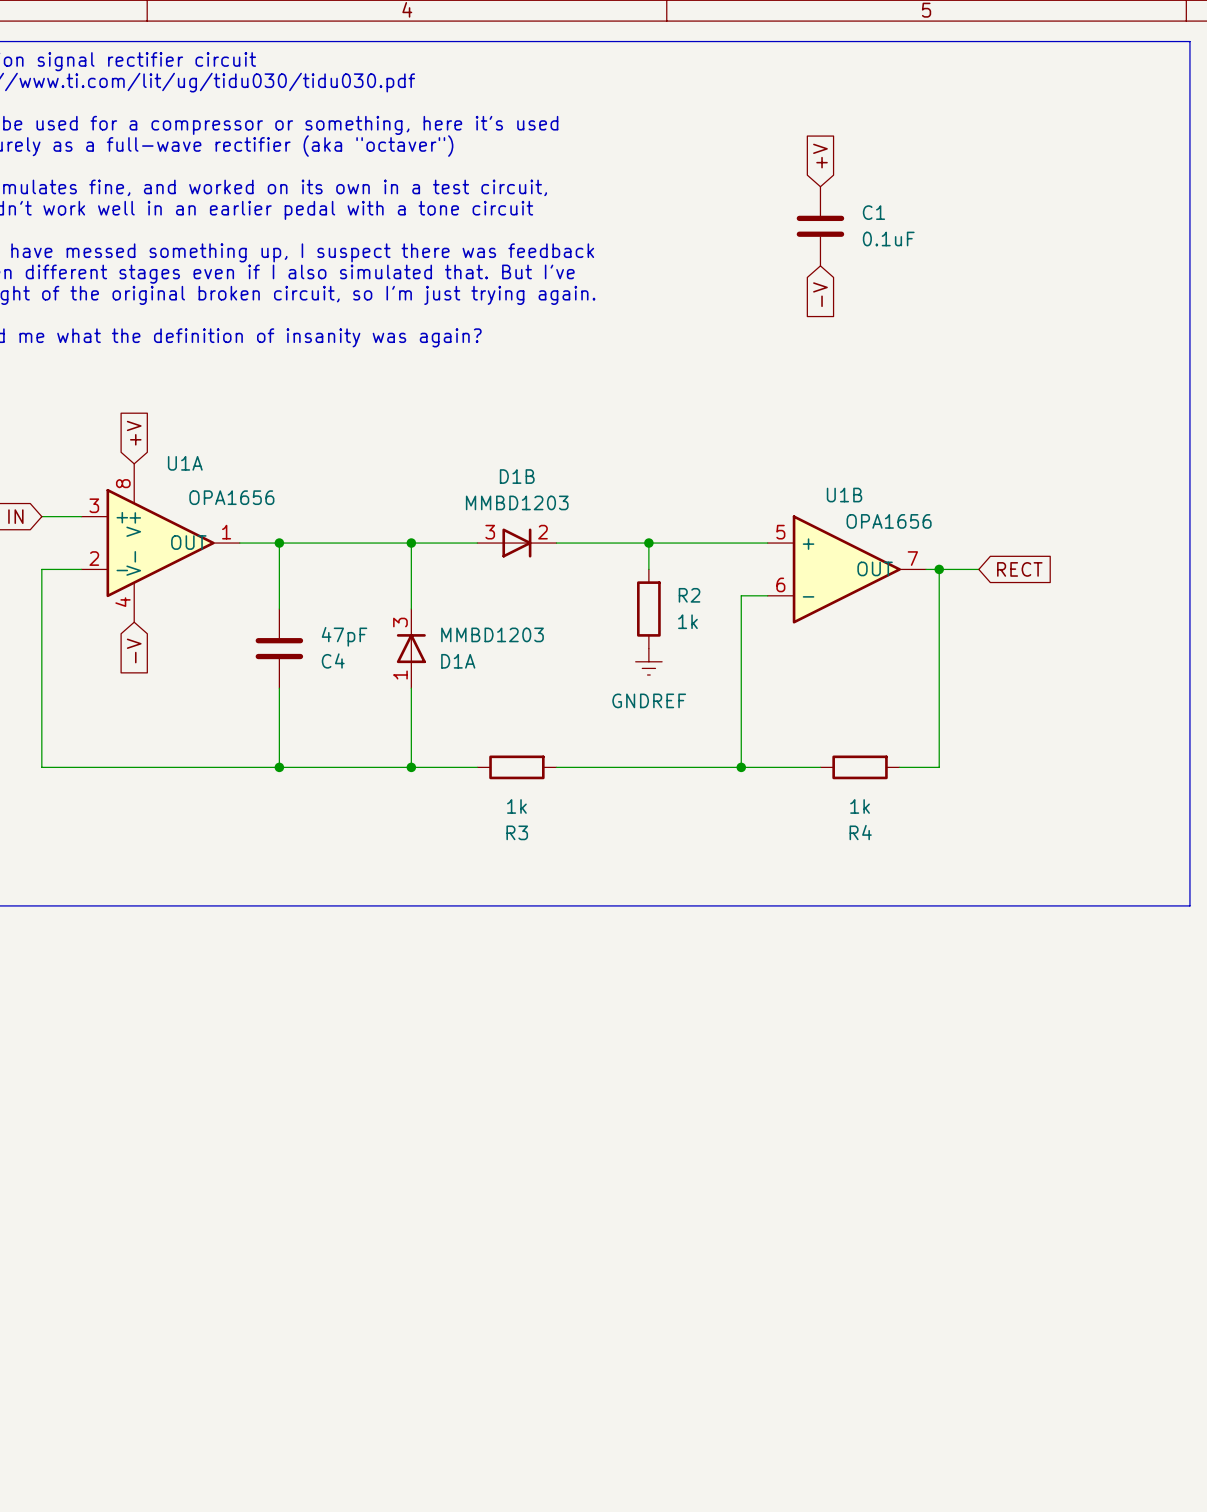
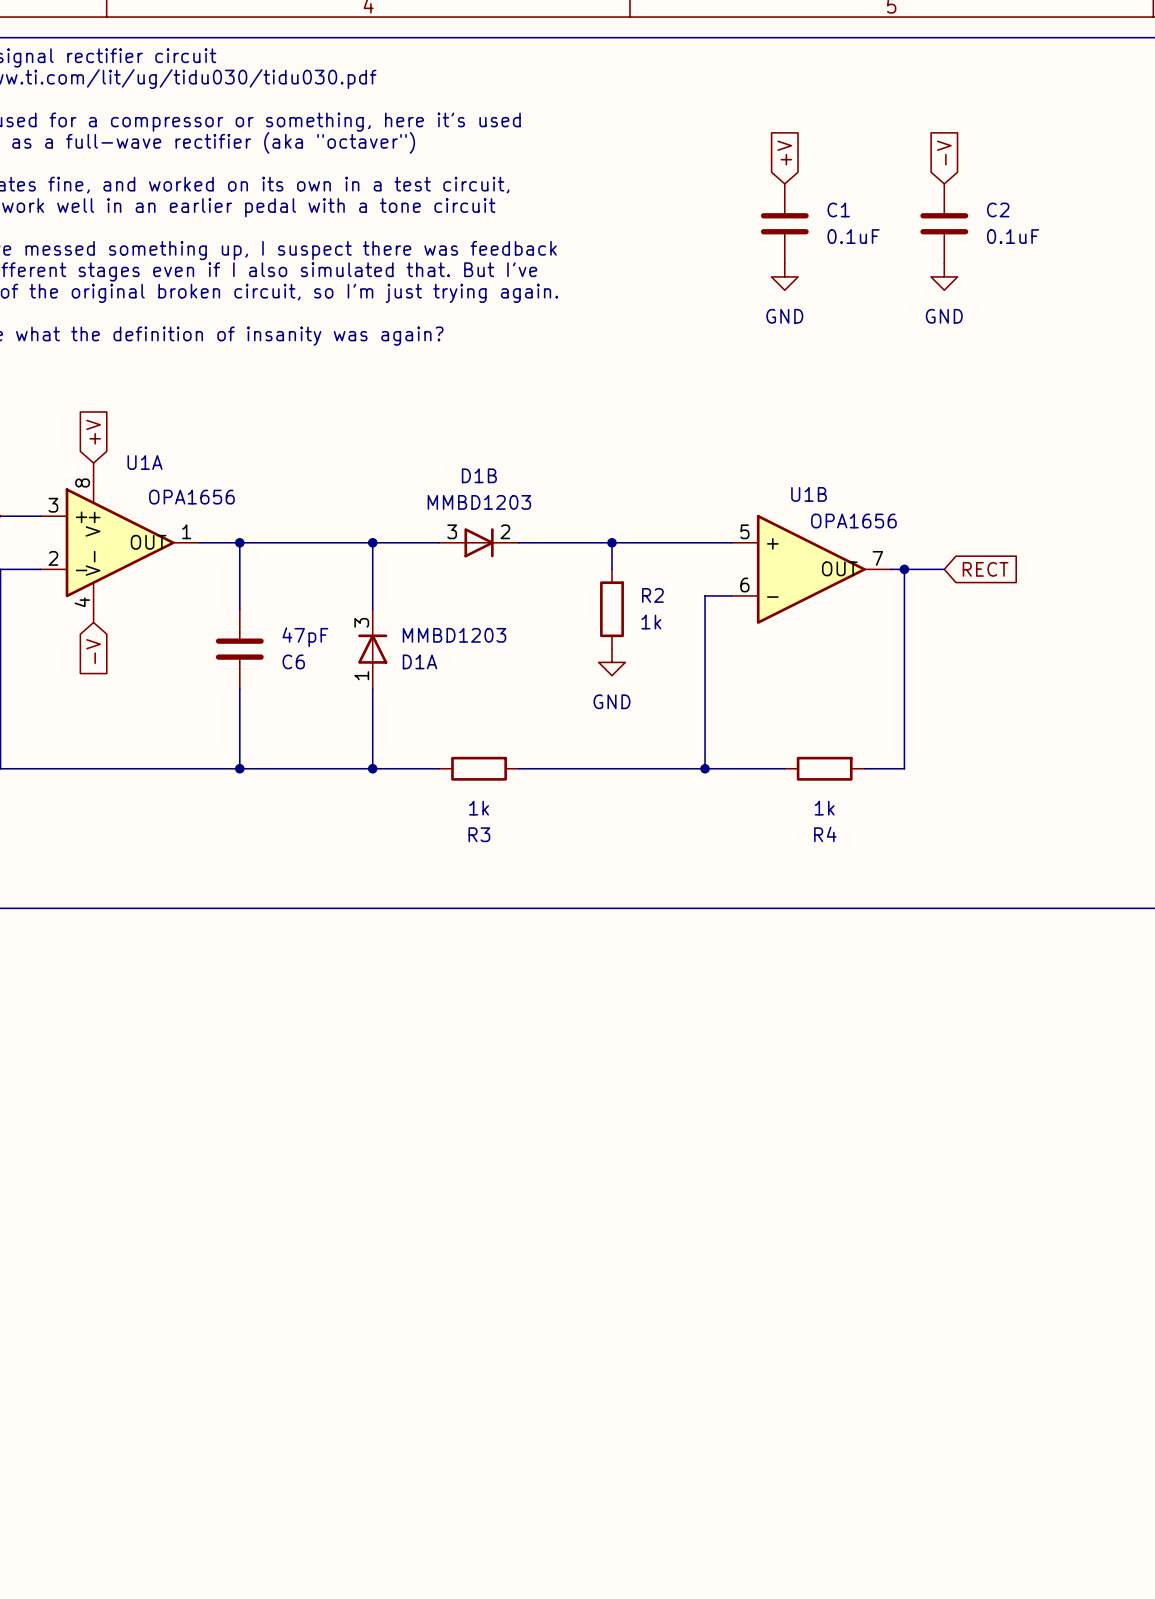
C2: none -> 0.1uF (944, 223)
power symbol: none -> GND (784, 276)
power symbol: none -> GND (944, 276)
global label rotation: 0° (820, 294) -> 180° (944, 153)
global label position: -V (820, 294) -> -V (944, 153)
C4 name: C4 (333, 661) -> C6 (293, 661)
power symbol: GNDREF (648, 661) -> GND (611, 662)

